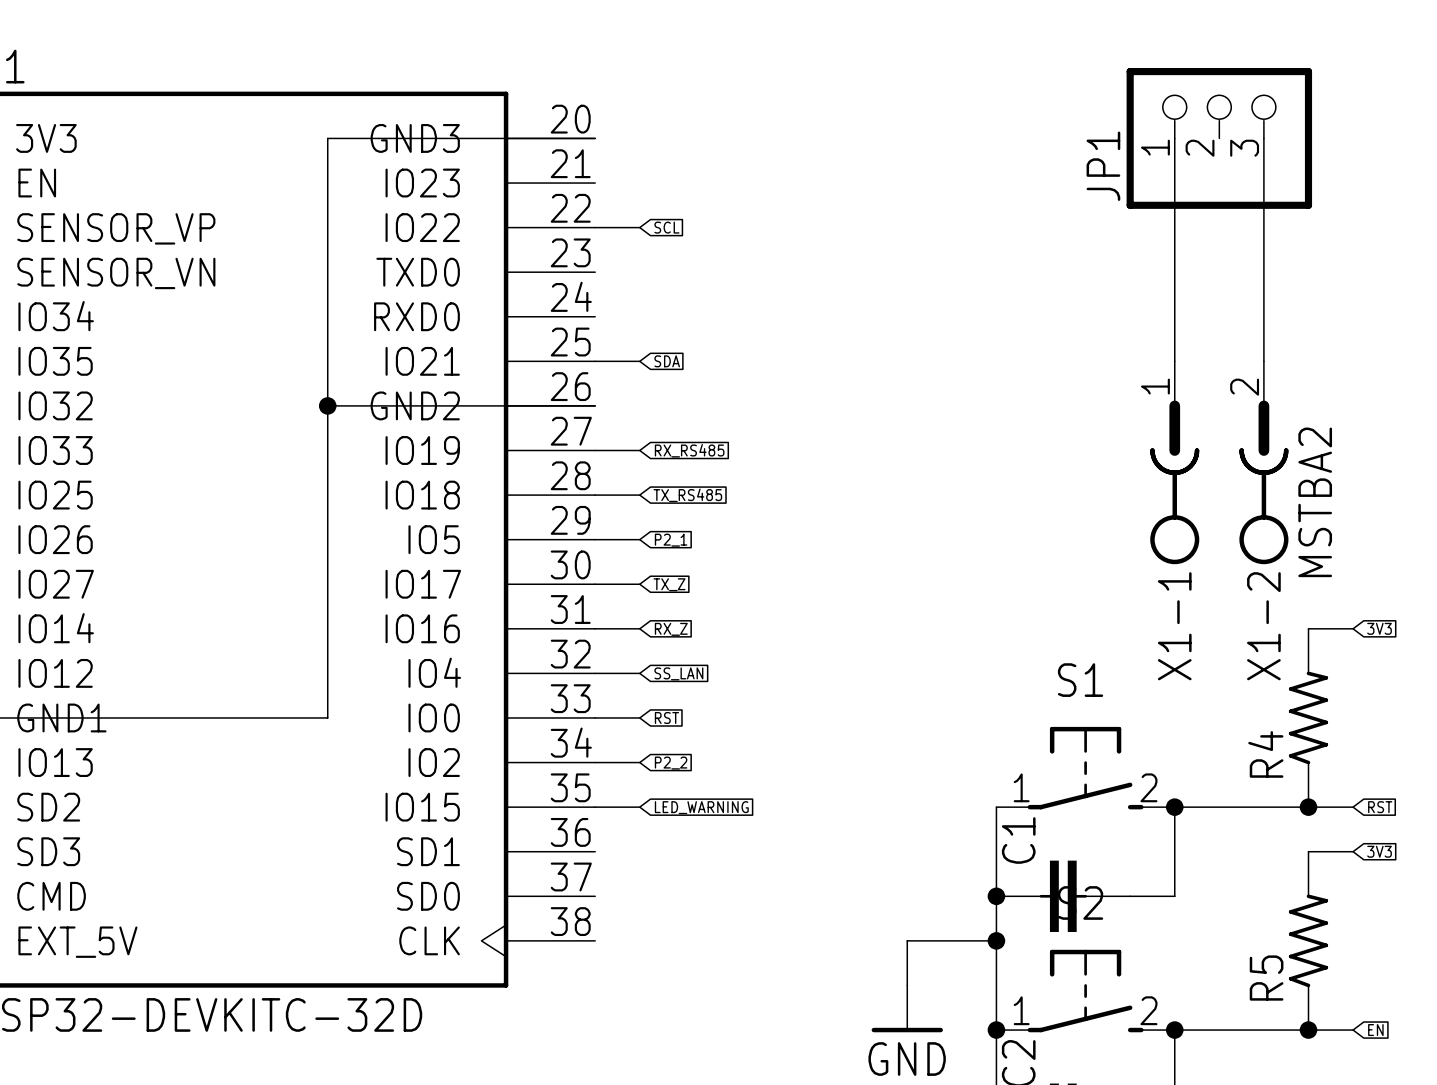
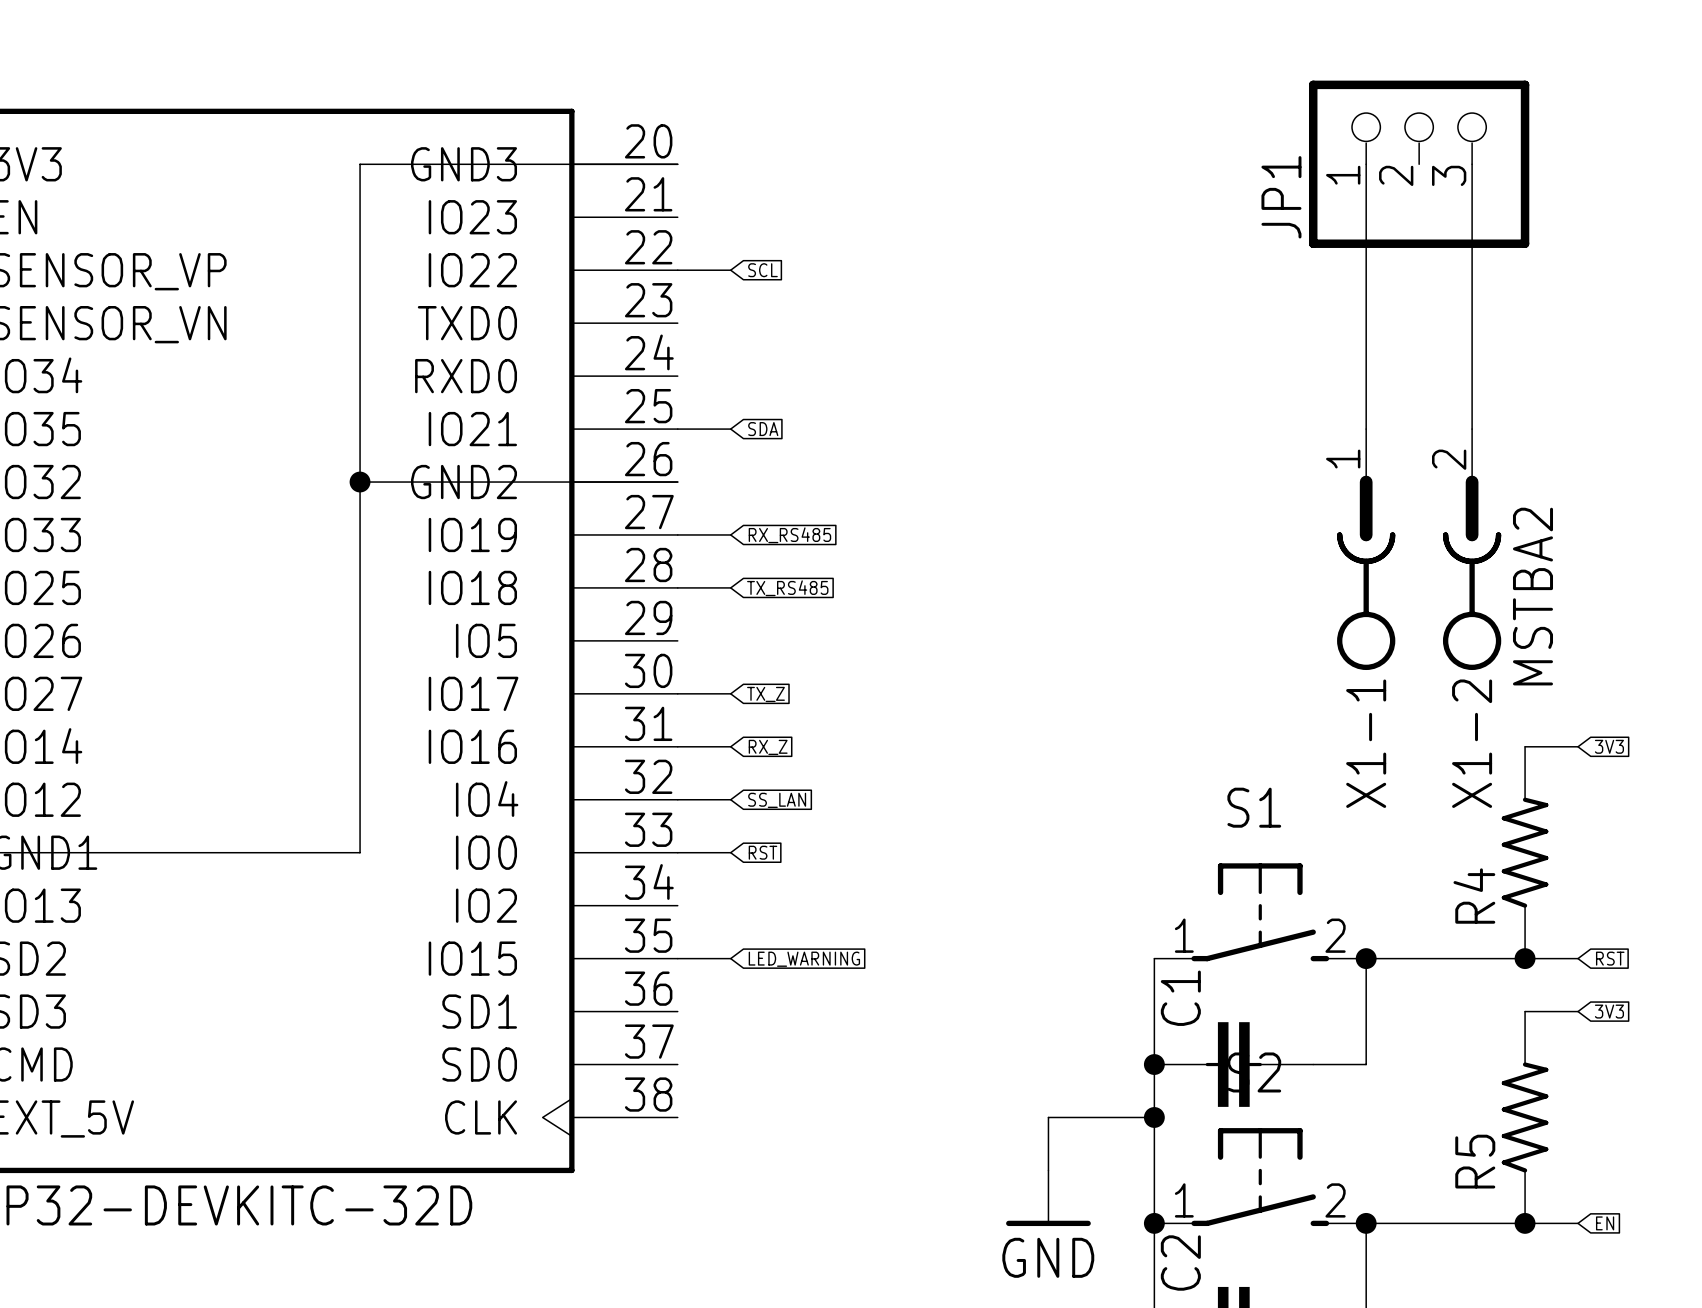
wire: (595, 539) (639, 539) -> none
global label: P2_1 (671, 540) -> none
wire: (595, 762) (639, 762) -> none
global label: P2_2 (671, 763) -> none

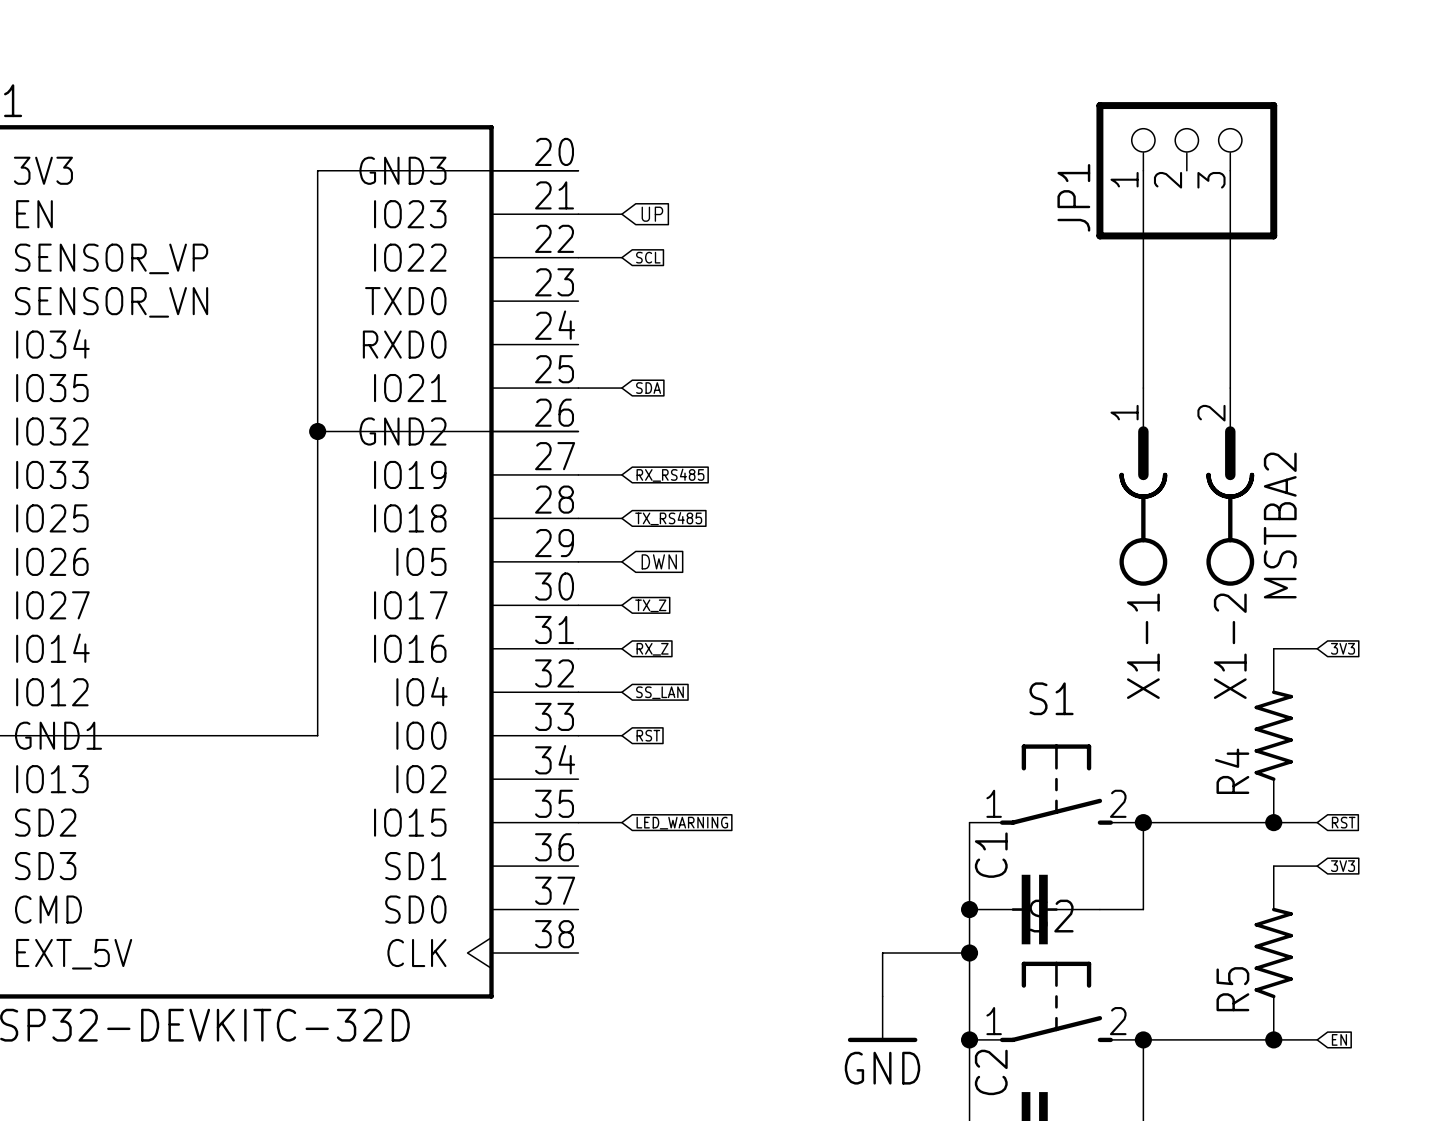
wire: none -> (578, 214) (621, 214)
global label: none -> UP (652, 214)
wire: none -> (578, 561) (621, 561)
global label: none -> DWN (659, 561)

